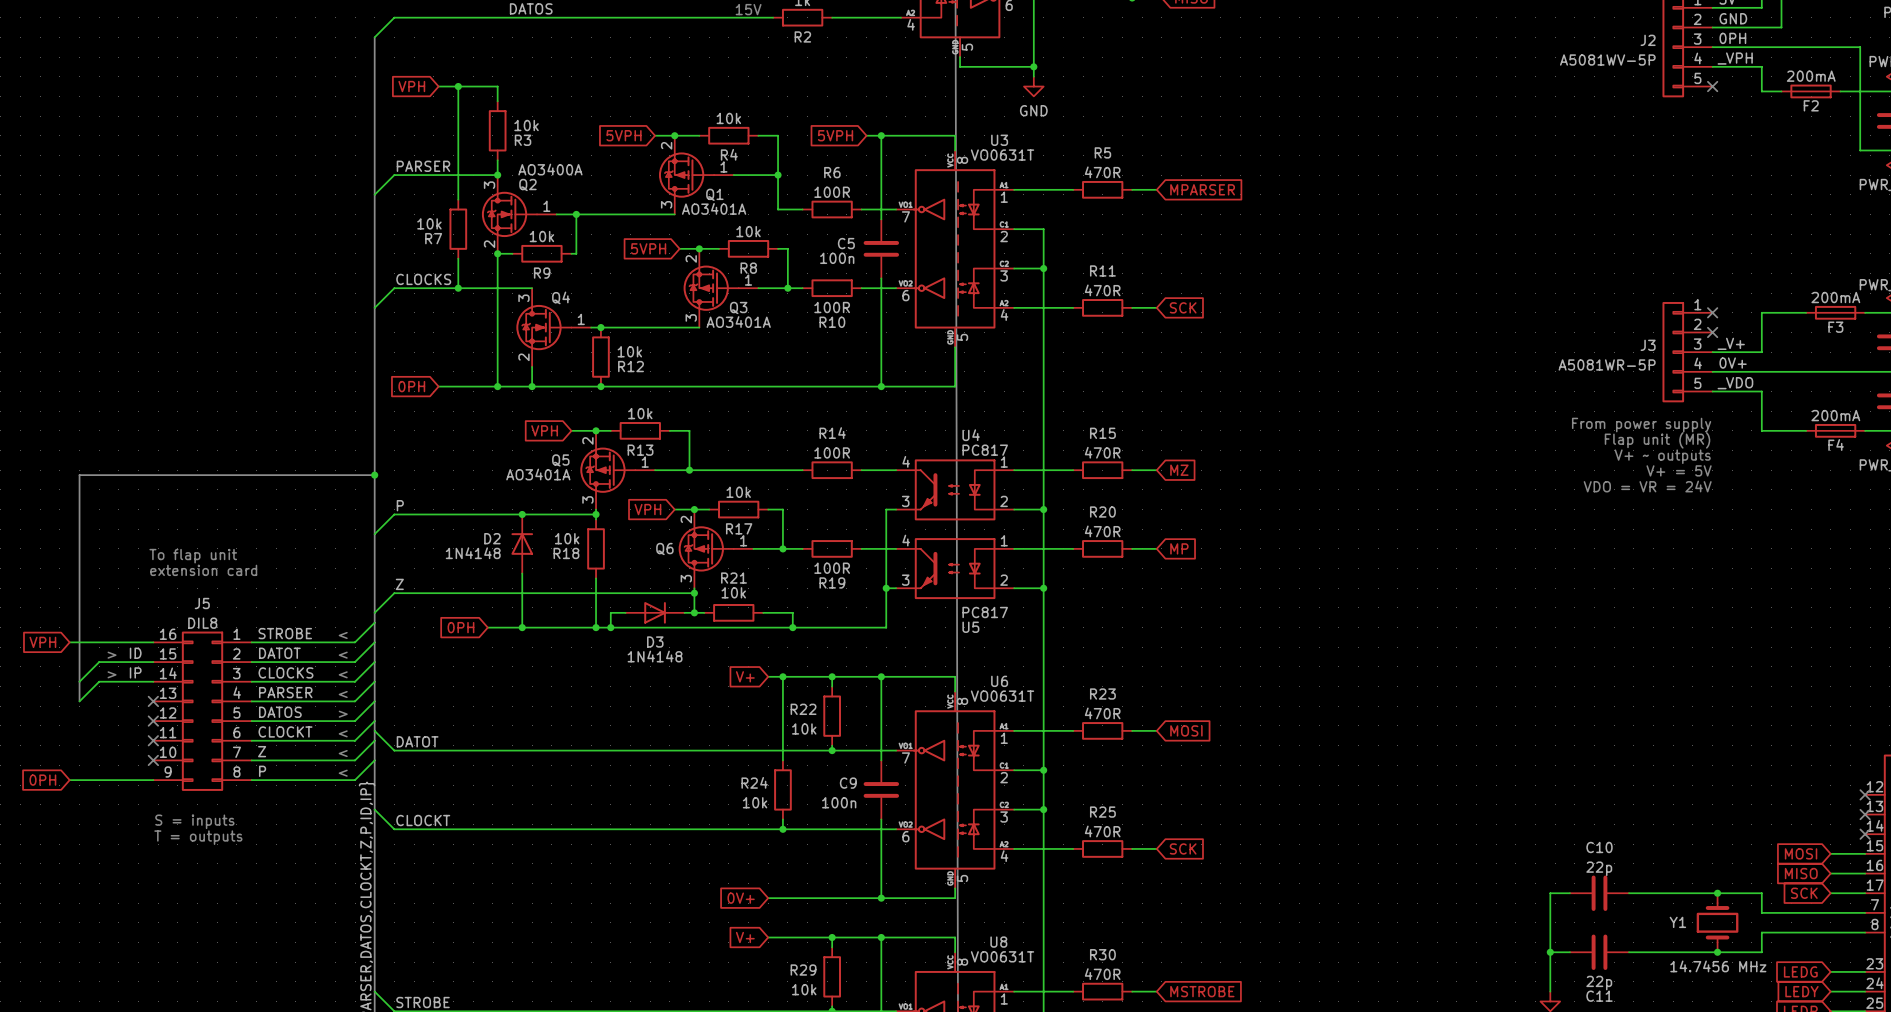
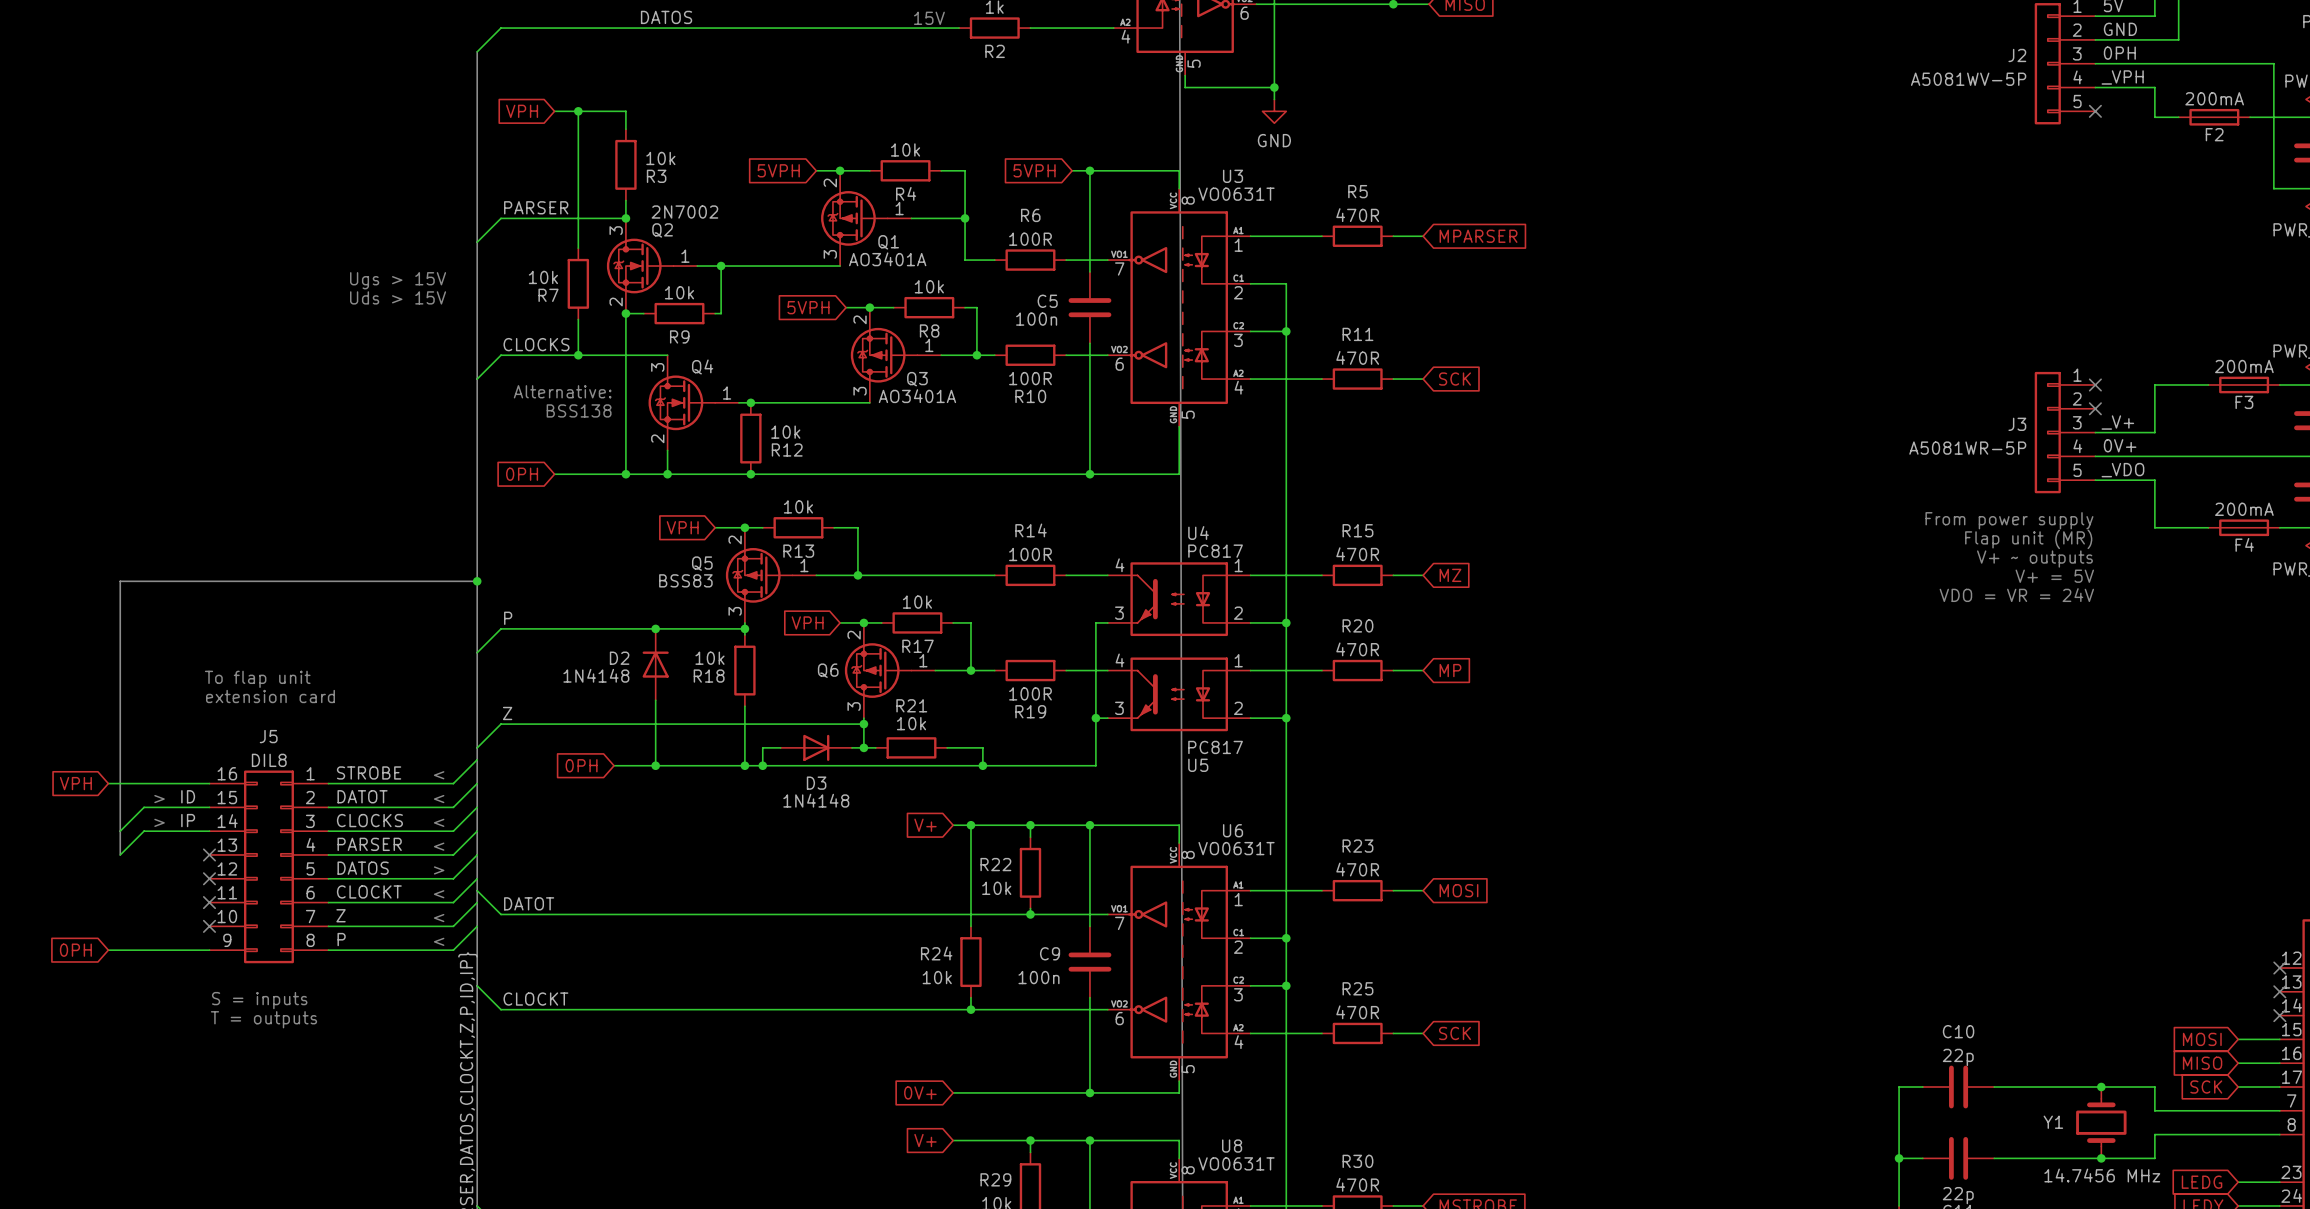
Q2 value: AO3400A (550, 169) -> 2N7002 (684, 212)
text: none -> Ugs > 15V (398, 280)
text: none -> Uds > 15V (398, 297)
text: none -> Alternative: (562, 391)
text: none -> BSS138 (579, 410)
Q5 value: AO3401A (538, 474) -> BSS83 (685, 580)

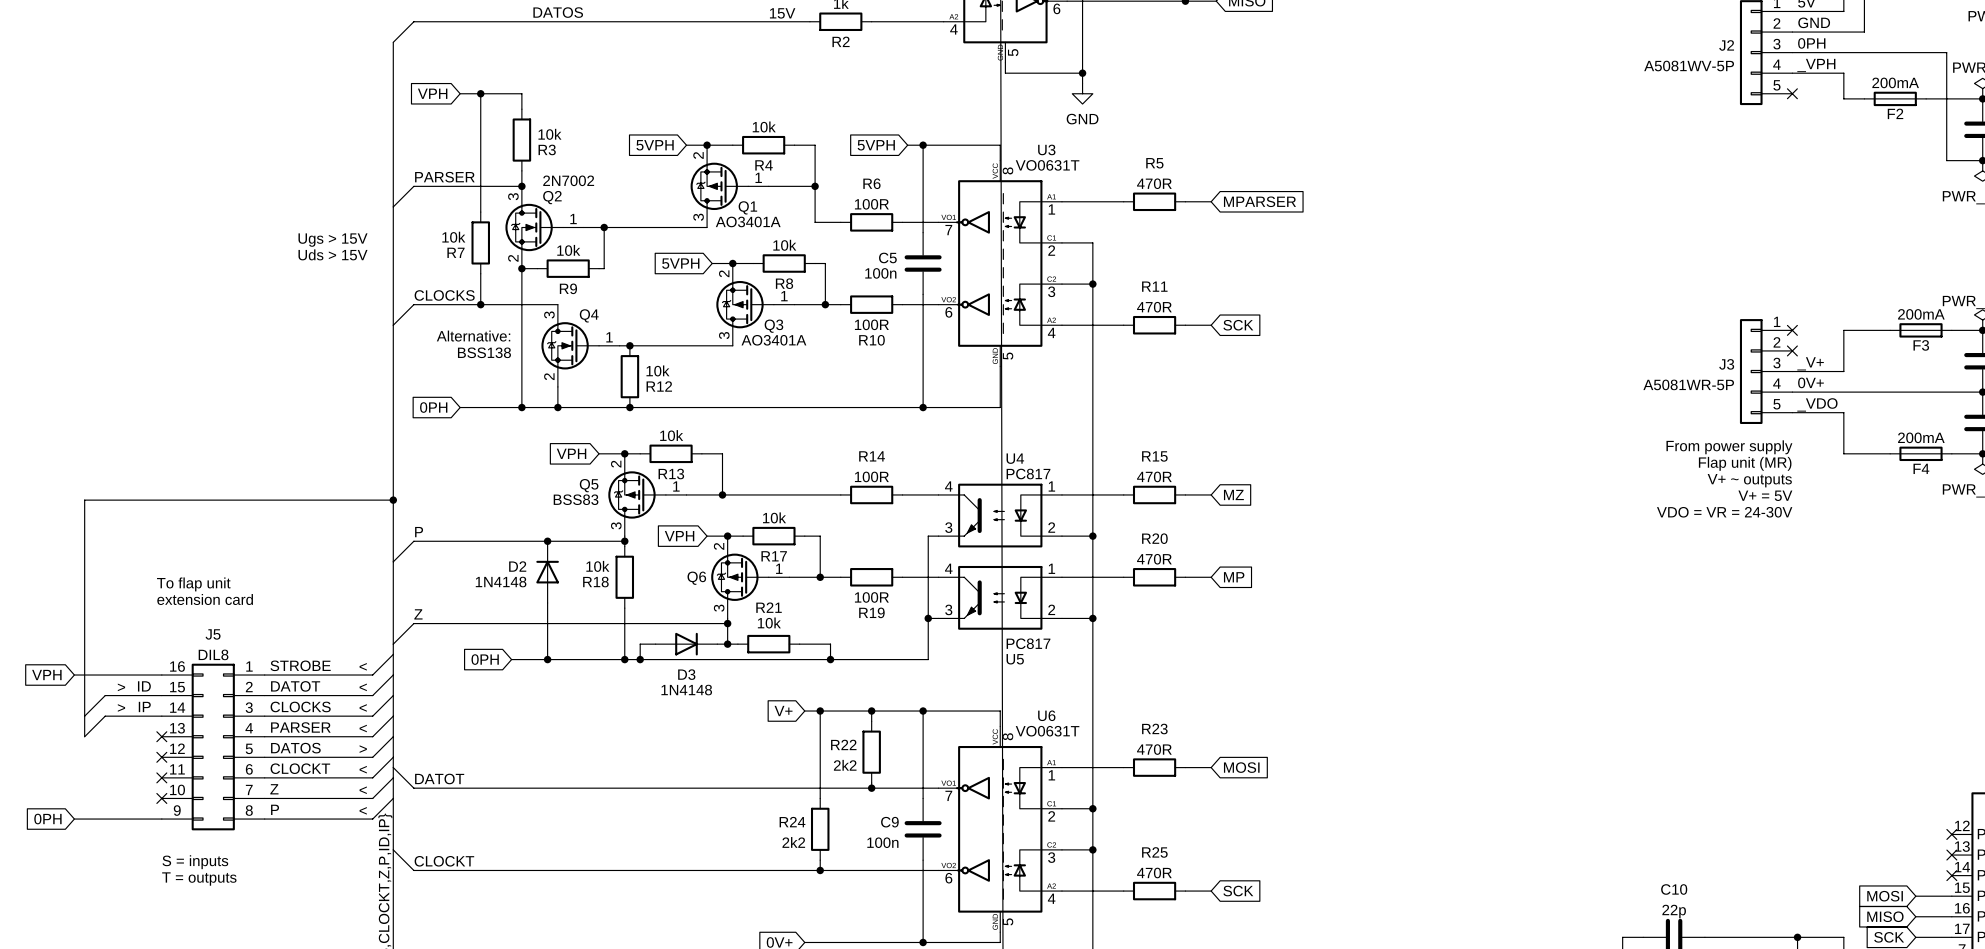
text: VDO = VR = 24V (2016, 595) -> VDO = VR = 24-30V (1724, 512)
R22 value: 10k (996, 888) -> 2k2 (845, 765)
R24 value: 10k (937, 977) -> 2k2 (793, 842)

